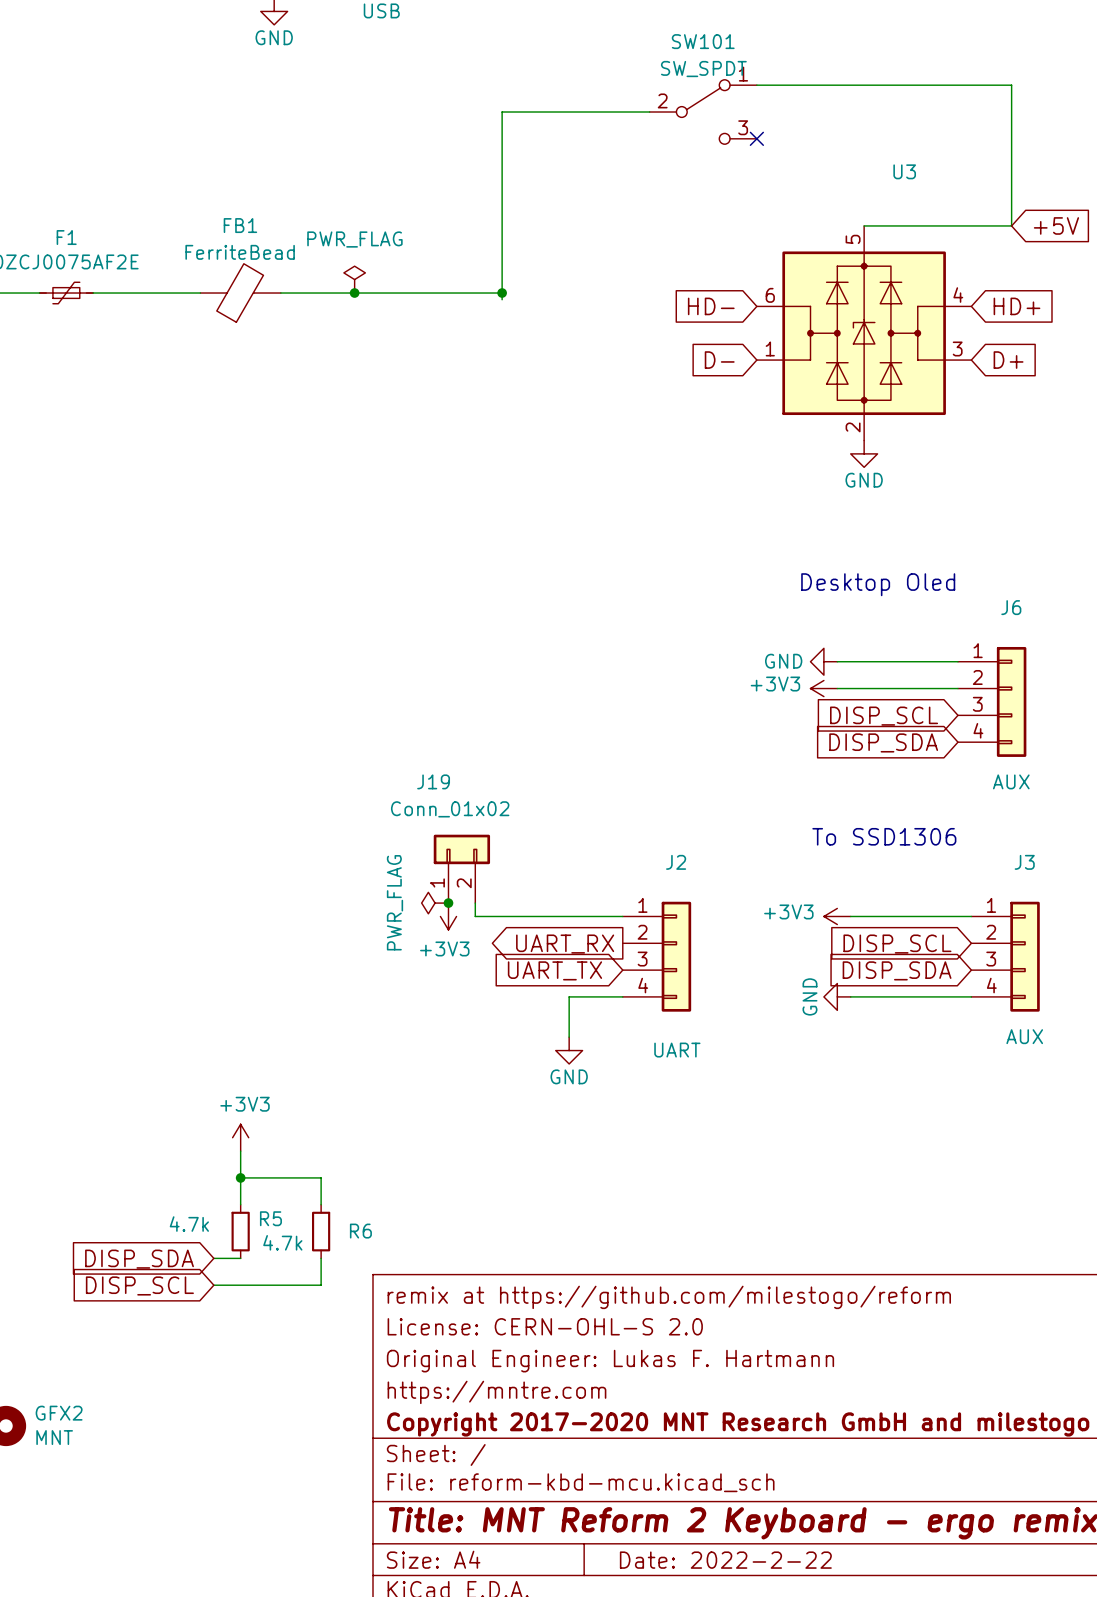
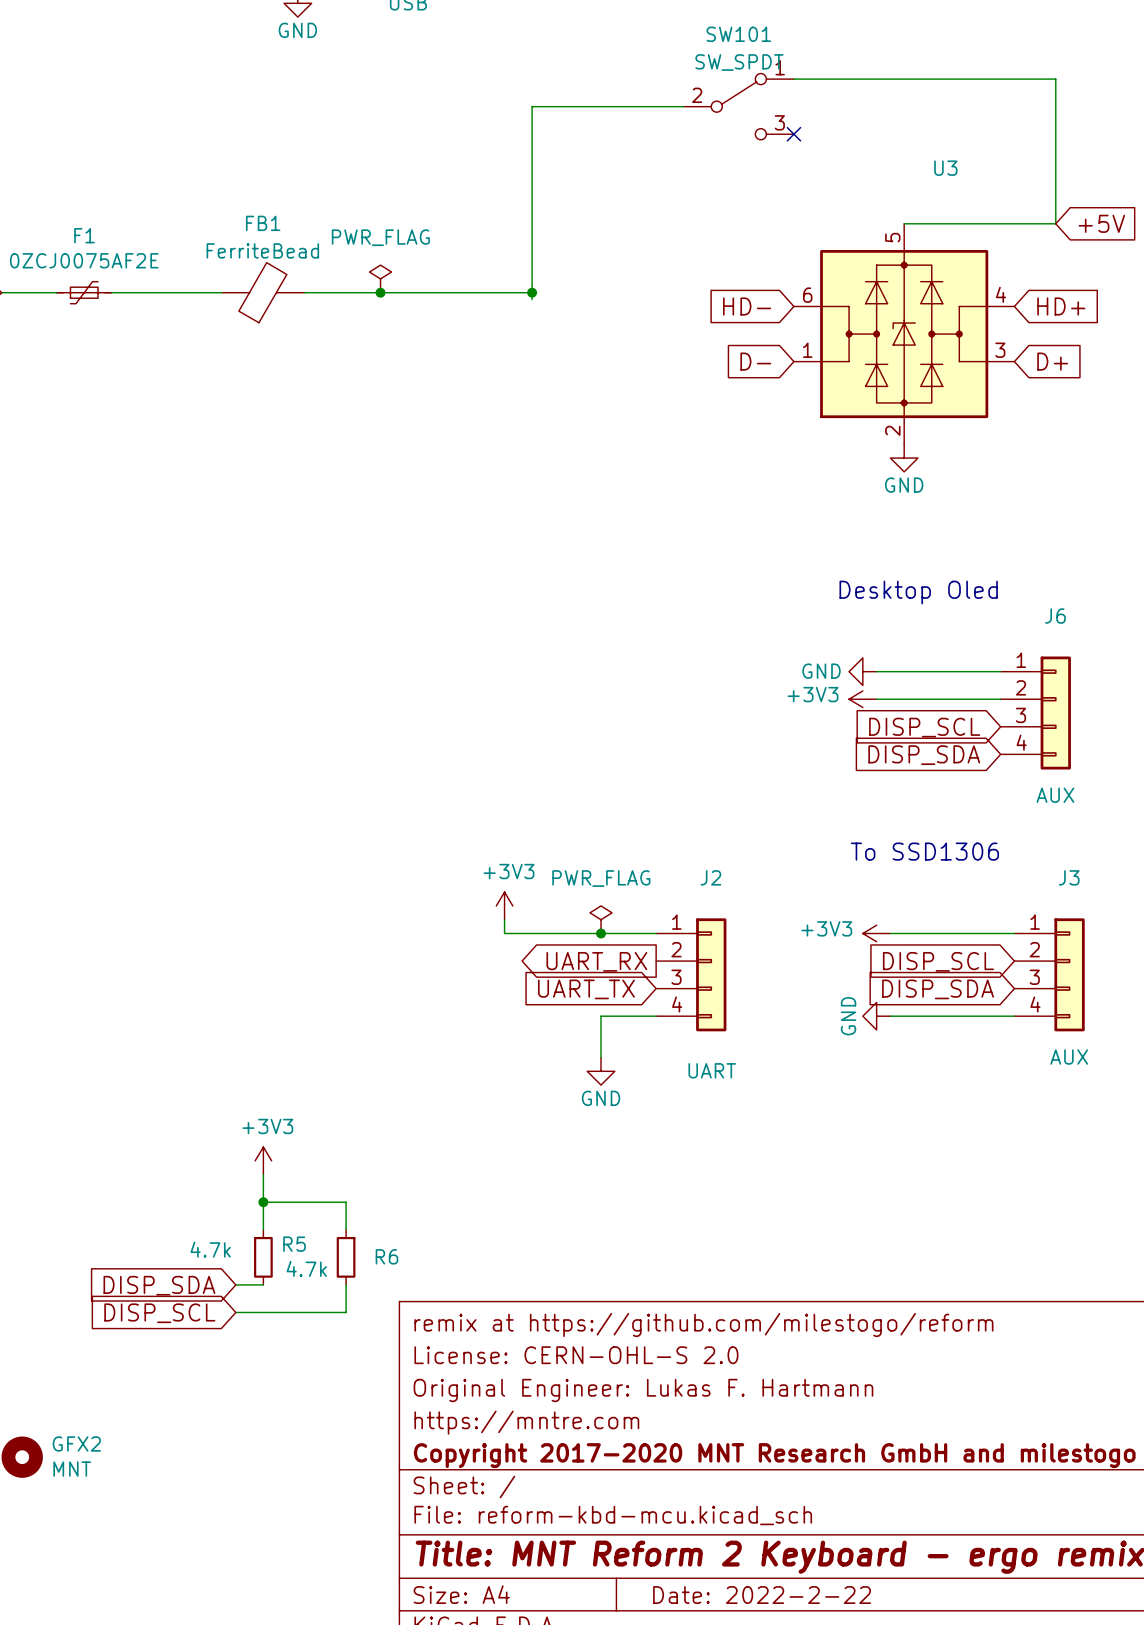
J19: Conn_01x02 (461, 868) -> none
power symbol rotation: 0° (435, 903) -> 90° clockwise (601, 919)
power symbol position: PWR_FLAG (435, 903) -> PWR_FLAG (601, 919)
junction: (448, 903) -> none
power symbol rotation: 0° (448, 916) -> 180° (504, 905)
power symbol position: +3V3 (448, 916) -> +3V3 (504, 905)
junction: none -> (601, 933)

